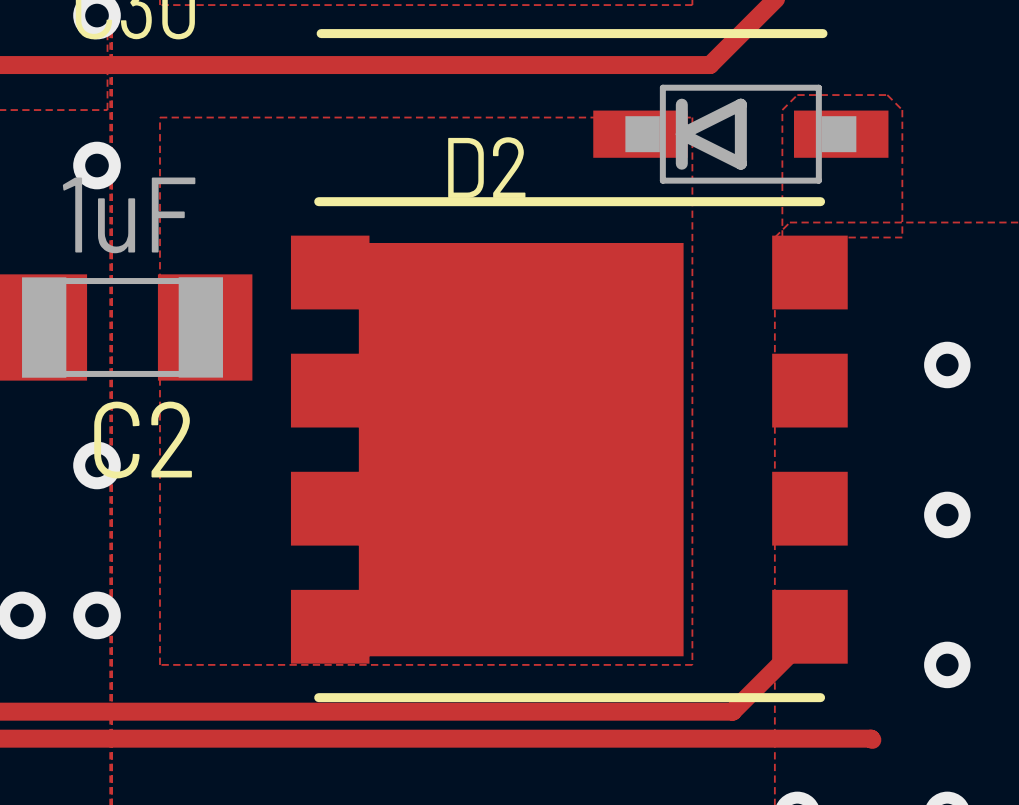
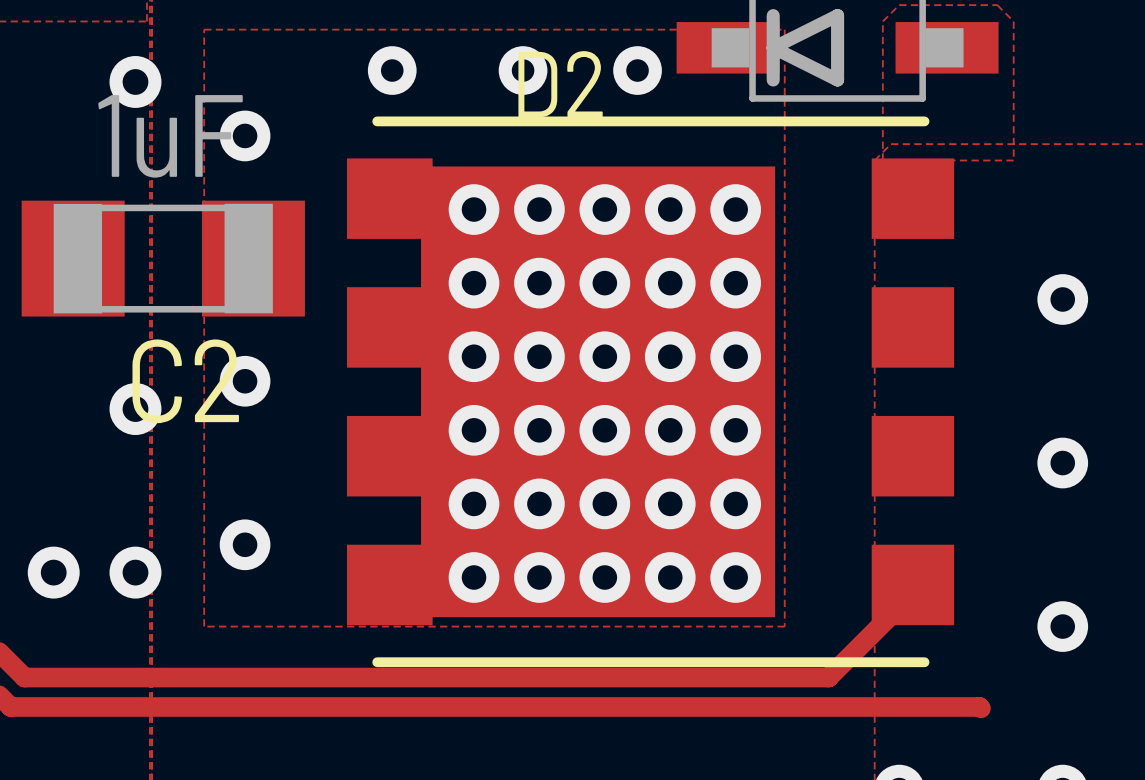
via: none -> (392, 70)
via: none -> (523, 70)
via: none -> (637, 70)
via: none -> (245, 135)
via: none -> (474, 209)
via: none -> (539, 209)
via: none -> (604, 209)
via: none -> (670, 209)
via: none -> (735, 209)
via: none -> (474, 283)
via: none -> (539, 283)
via: none -> (604, 283)
via: none -> (670, 283)
via: none -> (735, 283)
via: none -> (474, 356)
via: none -> (539, 356)
via: none -> (604, 356)
via: none -> (670, 356)
via: none -> (735, 356)
via: none -> (245, 381)
via: none -> (474, 430)
via: none -> (539, 430)
via: none -> (604, 430)
via: none -> (670, 430)
via: none -> (735, 430)
via: none -> (474, 503)
via: none -> (539, 503)
via: none -> (604, 503)
via: none -> (670, 503)
via: none -> (735, 503)
via: none -> (245, 544)
via: none -> (474, 577)
via: none -> (539, 577)
via: none -> (604, 577)
via: none -> (670, 577)
via: none -> (735, 577)

